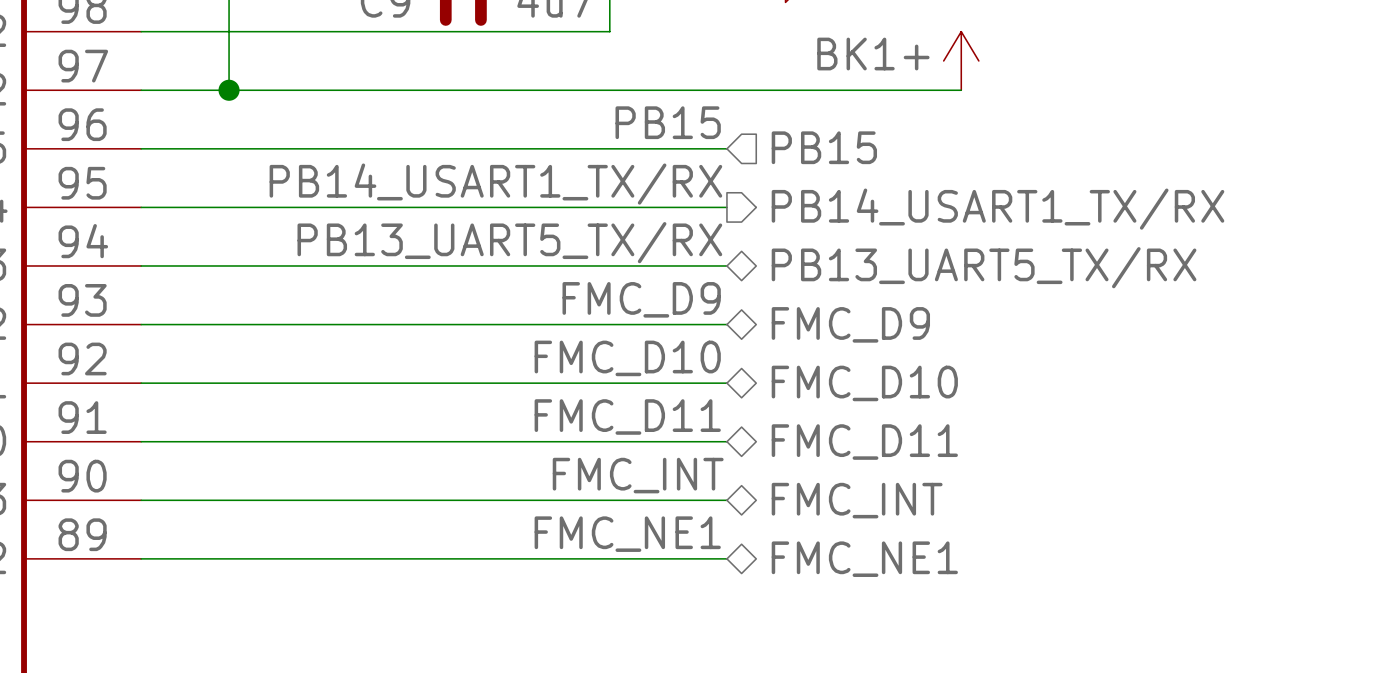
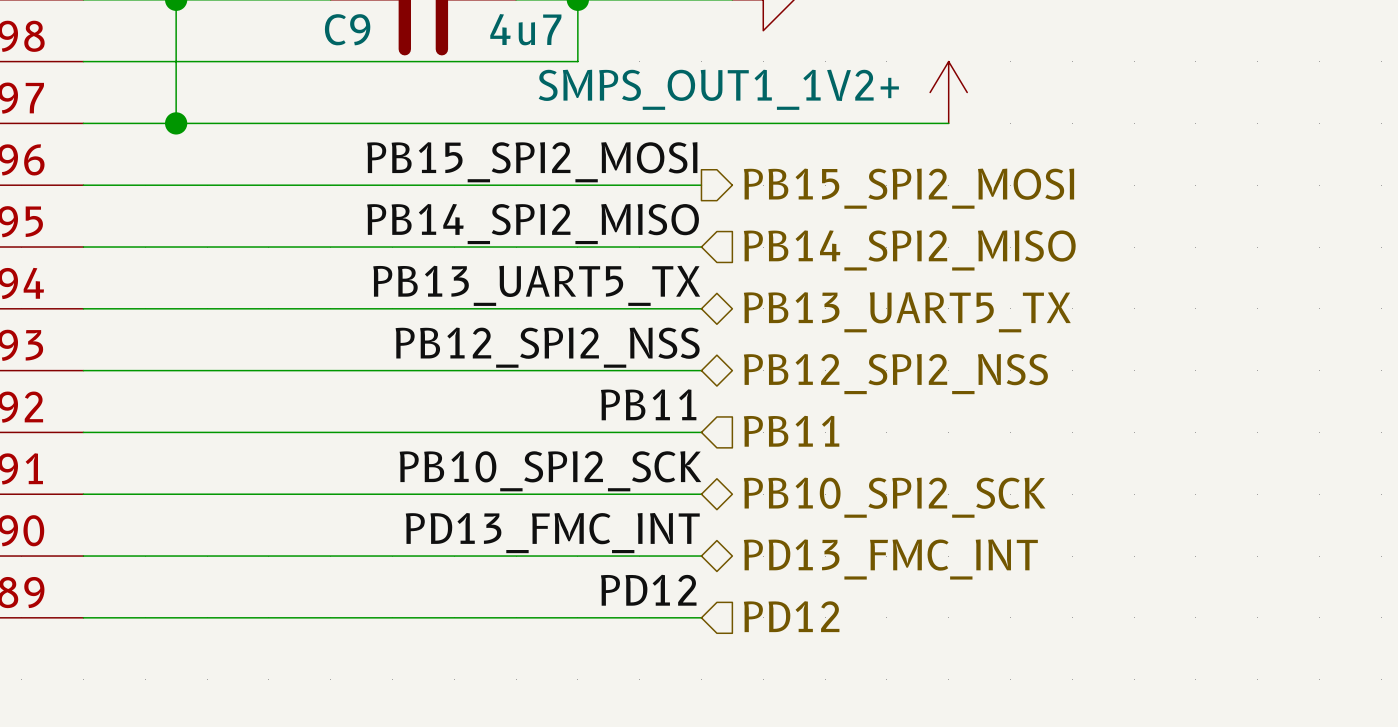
power symbol: BK1+ (961, 60) -> SMPS_OUT1_1V2+ (948, 92)
label: PB15 (668, 122) -> PB15_SPI2_MOSI (532, 162)
hierarchical label shape: input (824, 147) -> output (908, 188)
hierarchical label: PB15 (824, 147) -> PB15_SPI2_MOSI (908, 188)
label: PB14_USART1_TX/RX (495, 184) -> PB14_SPI2_MISO (533, 224)
hierarchical label shape: output (997, 209) -> input (909, 250)
hierarchical label: PB14_USART1_TX/RX (997, 209) -> PB14_SPI2_MISO (909, 250)
label: PB13_UART5_TX/RX (509, 242) -> PB13_UART5_TX (536, 285)
hierarchical label: PB13_UART5_TX/RX (984, 267) -> PB13_UART5_TX (907, 312)
label: FMC_D9 (641, 299) -> PB12_SPI2_NSS (547, 347)
hierarchical label: FMC_D9 (850, 324) -> PB12_SPI2_NSS (895, 374)
label: FMC_D10 (627, 358) -> PB11 (648, 404)
hierarchical label shape: bidirectional (864, 383) -> input (791, 431)
hierarchical label: FMC_D10 (864, 383) -> PB11 (791, 431)
label: FMC_D11 (627, 416) -> PB10_SPI2_SCK (550, 471)
hierarchical label: FMC_D11 (864, 442) -> PB10_SPI2_SCK (894, 497)
label: FMC_INT (638, 475) -> PD13_FMC_INT (552, 533)
hierarchical label: FMC_INT (857, 500) -> PD13_FMC_INT (890, 559)
label: FMC_NE1 (627, 534) -> PD12 (648, 590)
hierarchical label shape: bidirectional (864, 559) -> input (791, 616)
hierarchical label: FMC_NE1 (864, 559) -> PD12 (791, 616)

